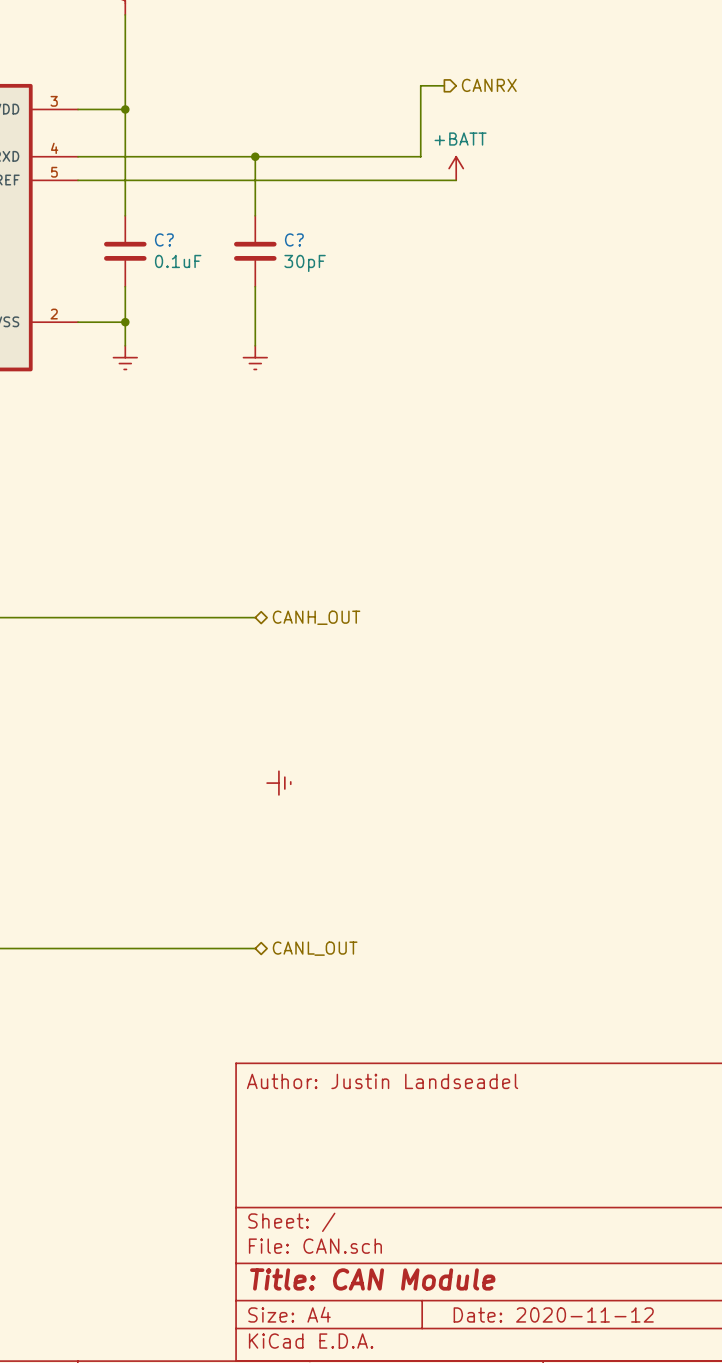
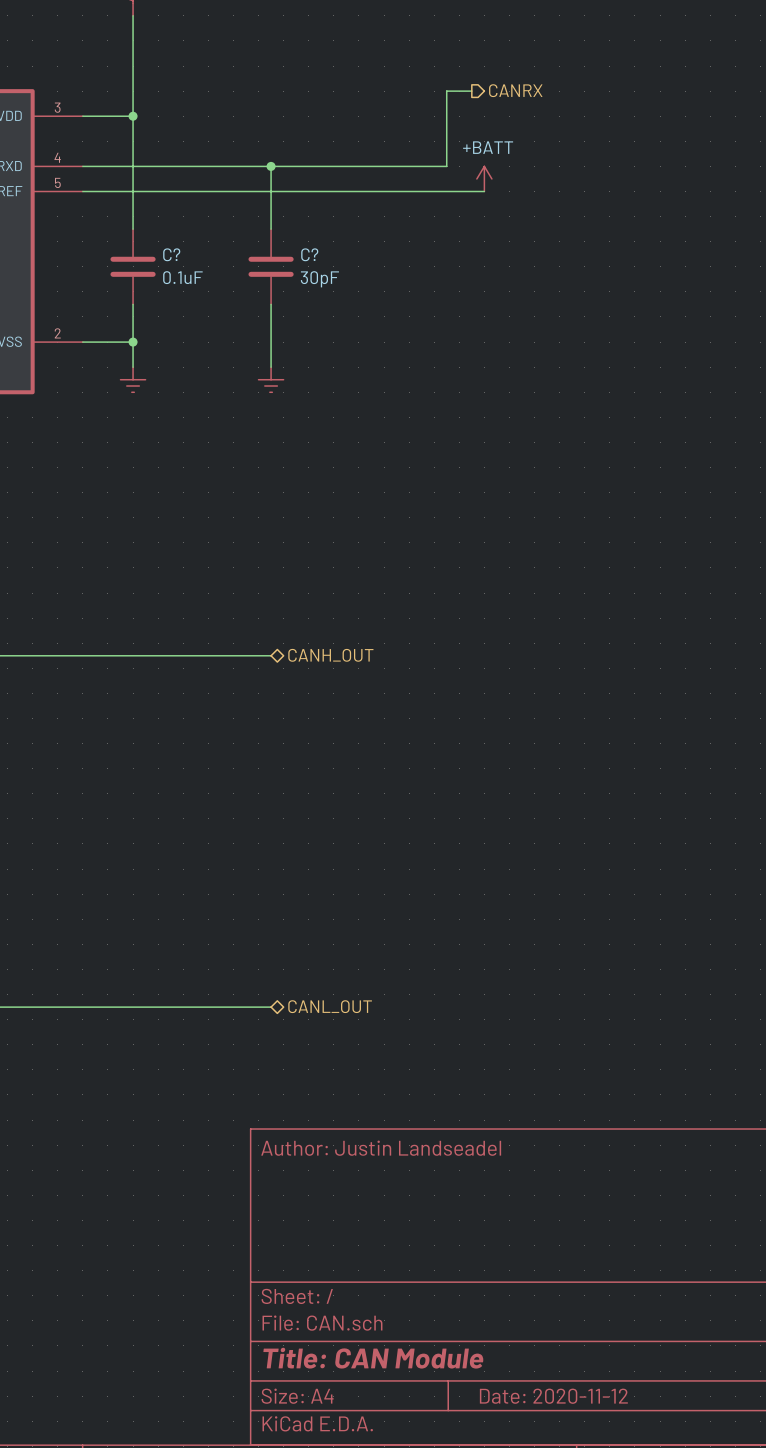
power symbol: (278, 783) -> none

